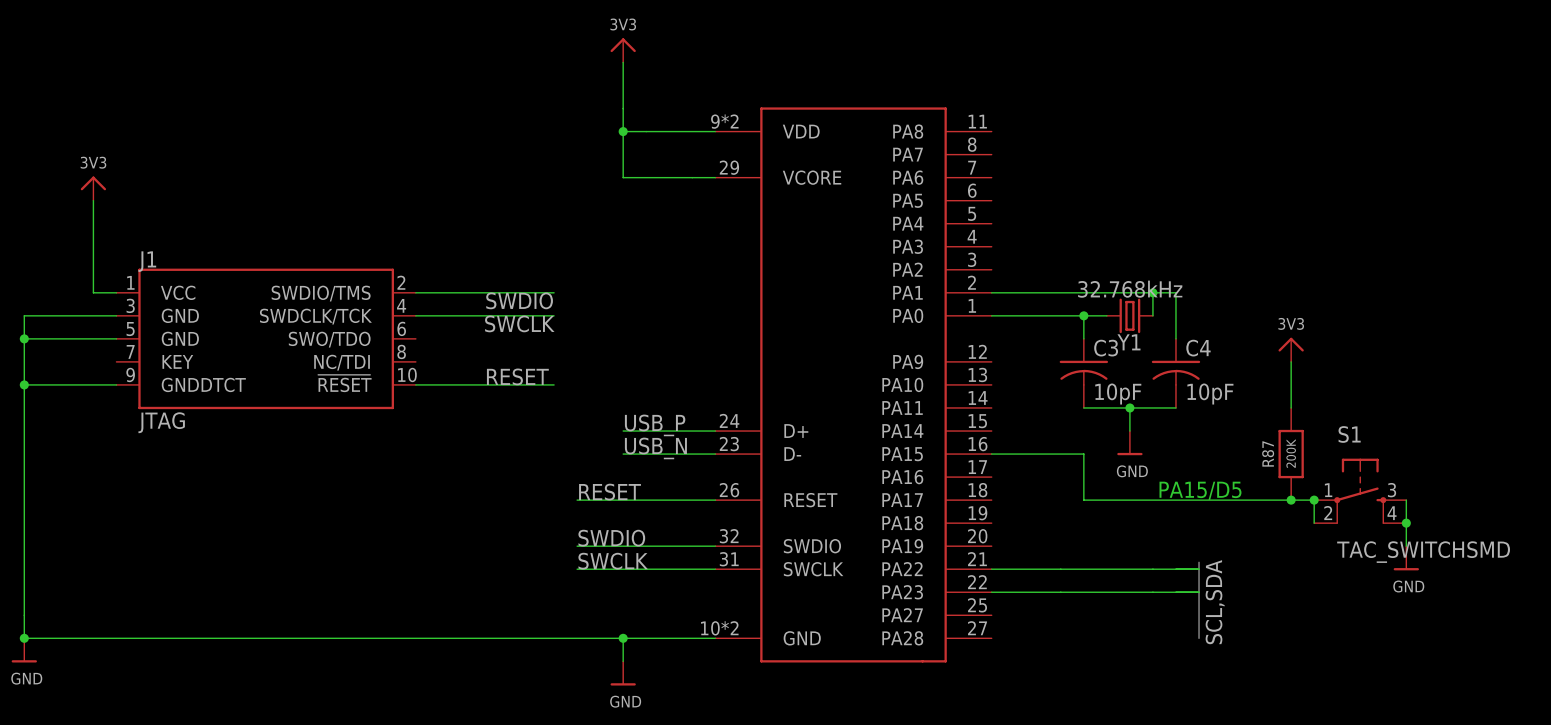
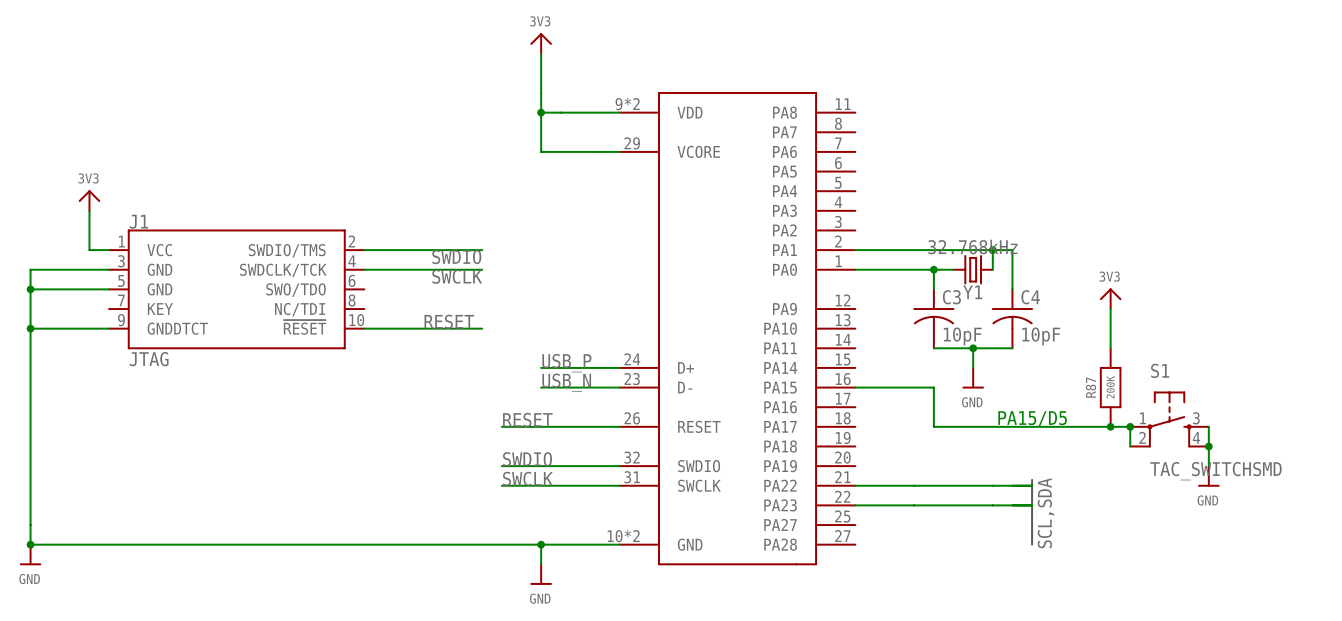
power symbol position: 3V3 (93, 188) -> 3V3 (89, 200)

